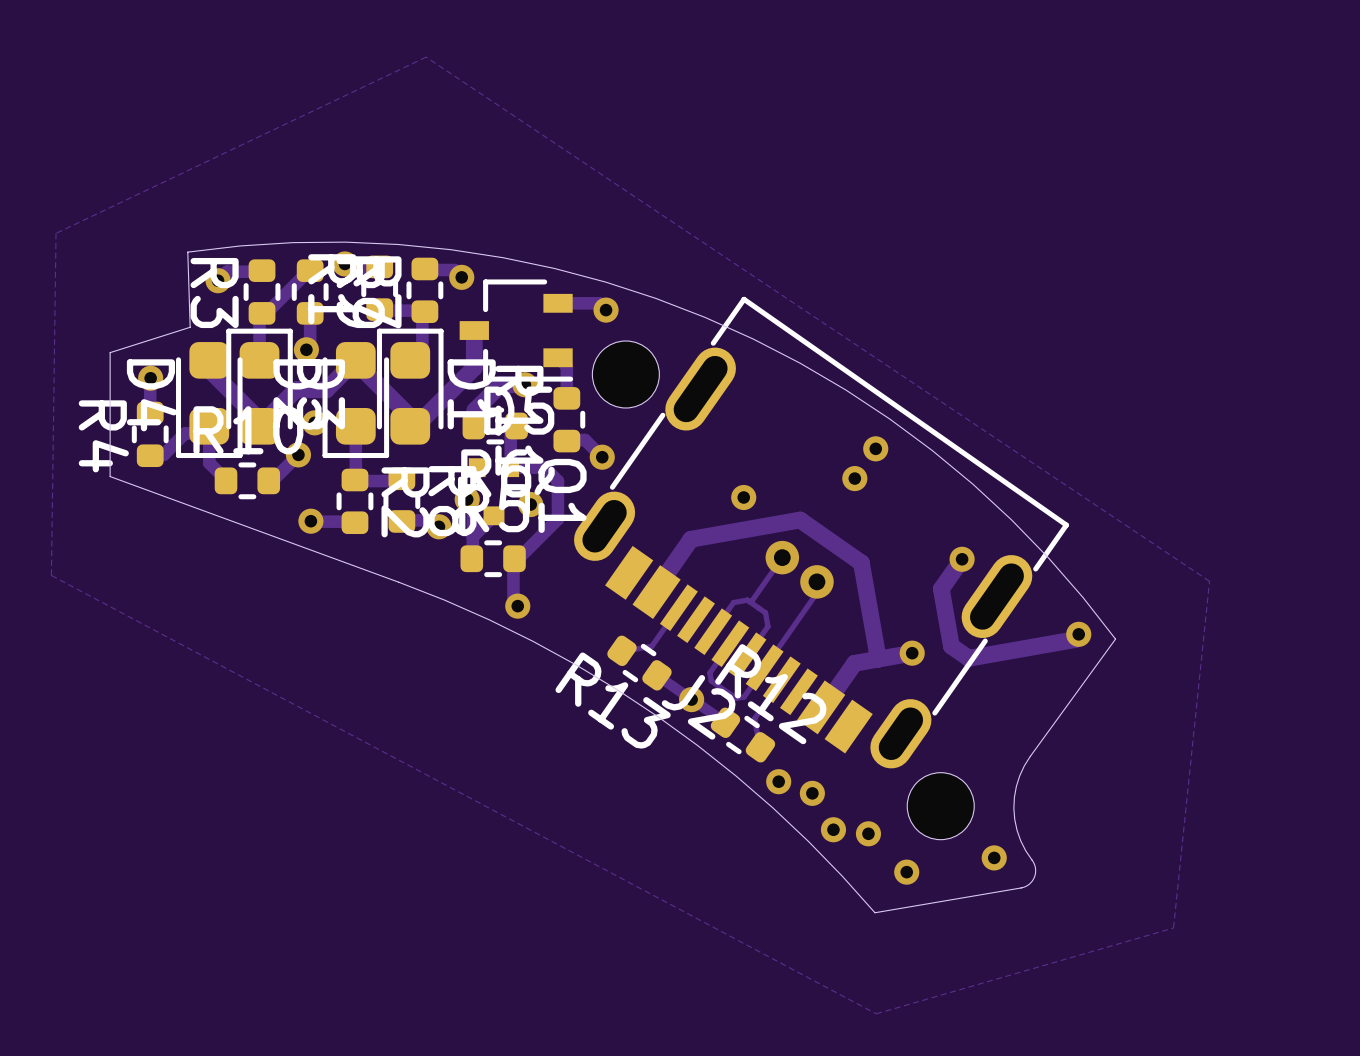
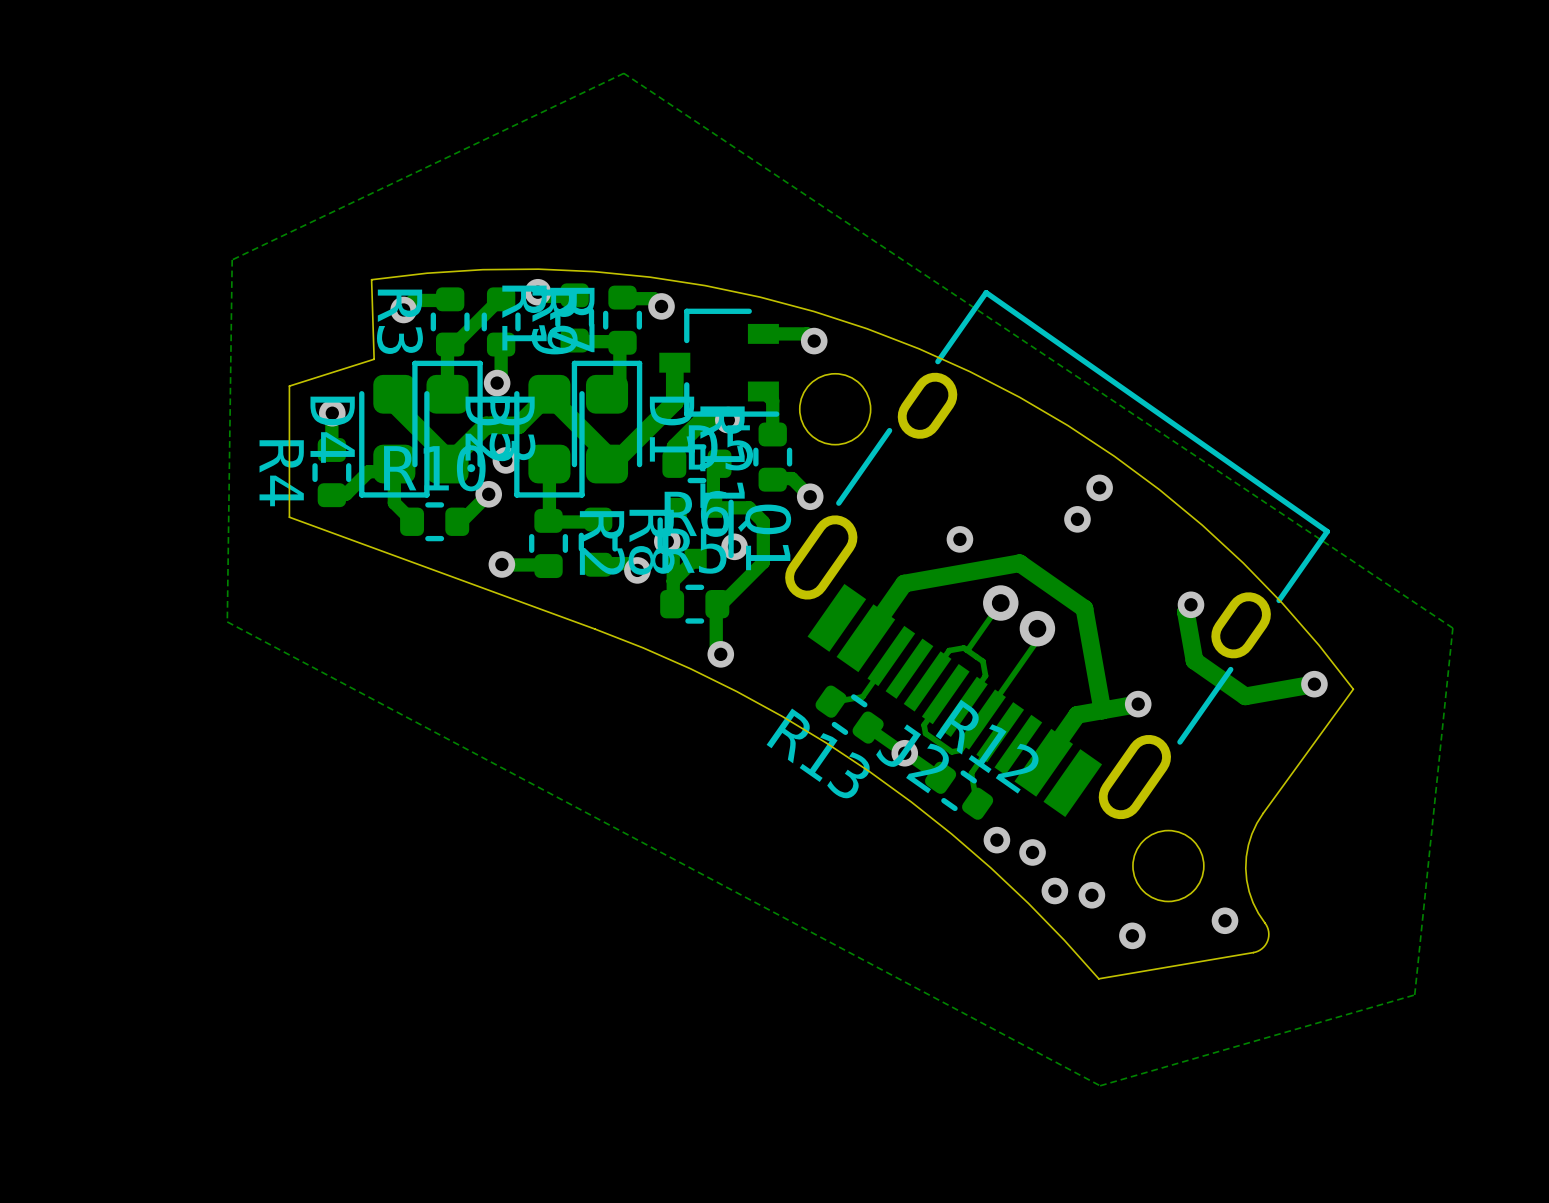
J2 footprint: [574, 296, 1069, 769] -> [785, 290, 1330, 820]
track: (957, 566) (941, 588) (951, 646) (968, 658) (1075, 639) (1078, 634) -> (1185, 612) (1194, 660) (1245, 696) (1314, 684)

